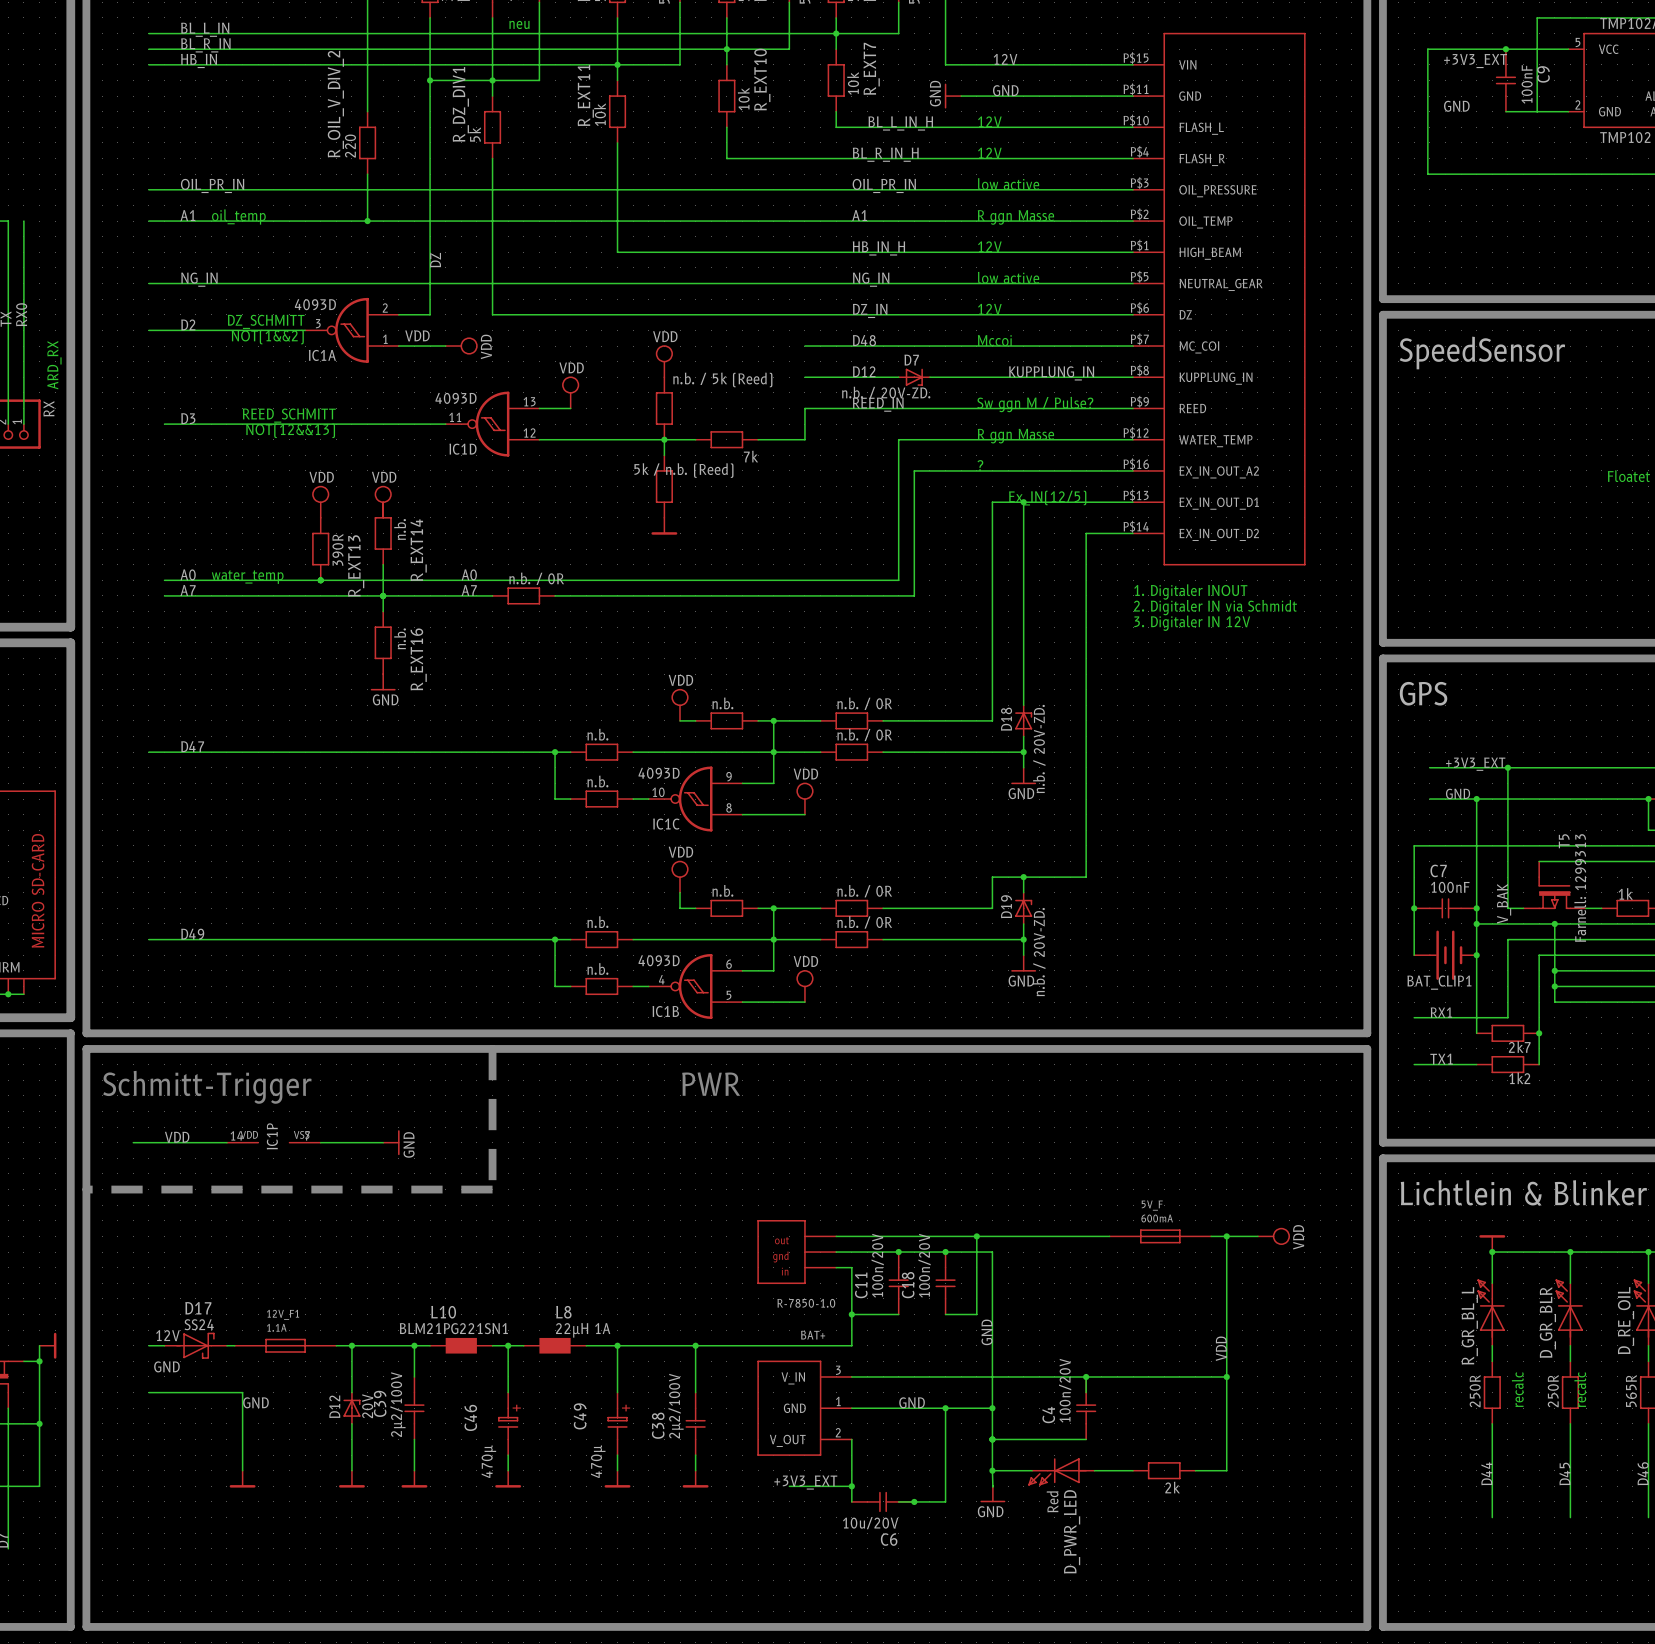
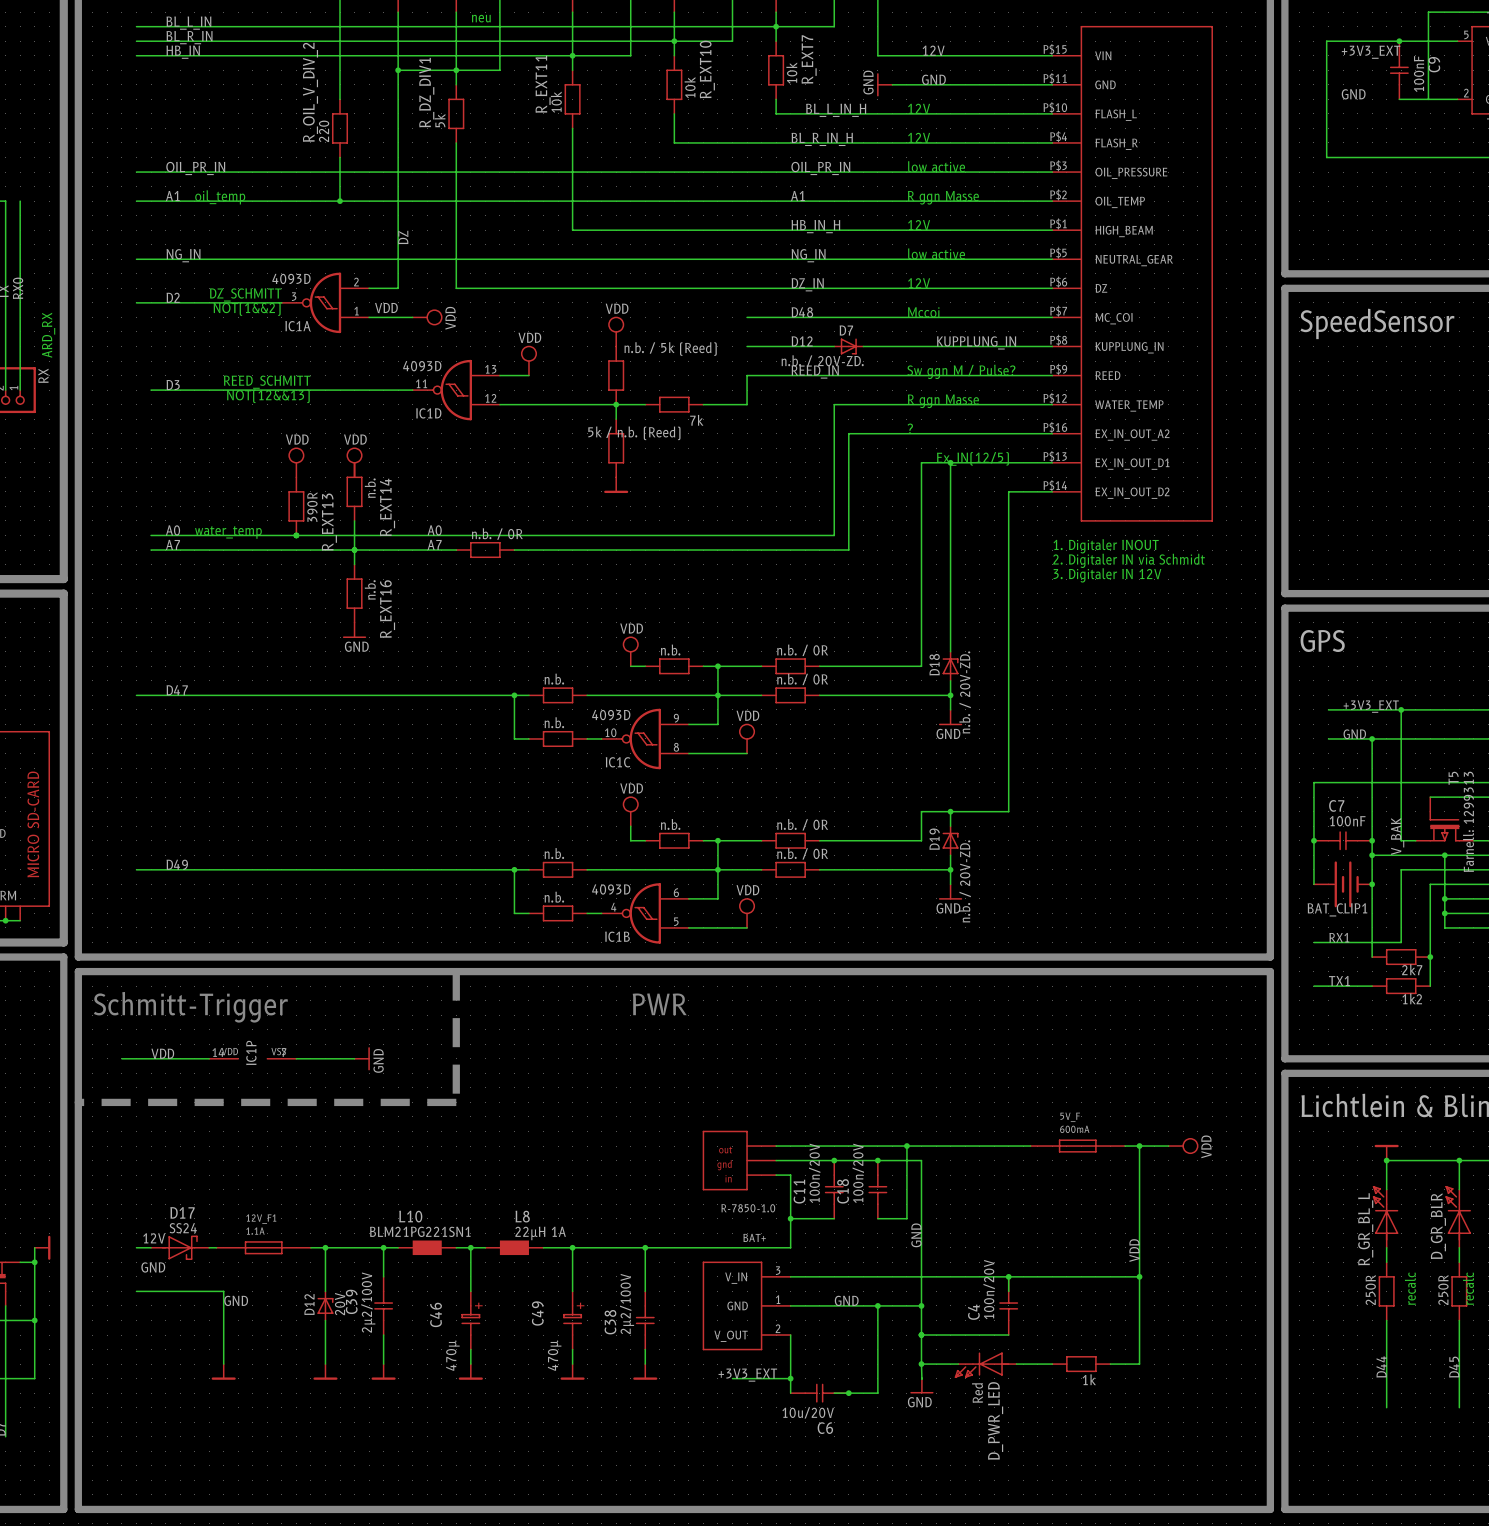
part value: 2k (1172, 1487) -> 1k (1089, 1379)

